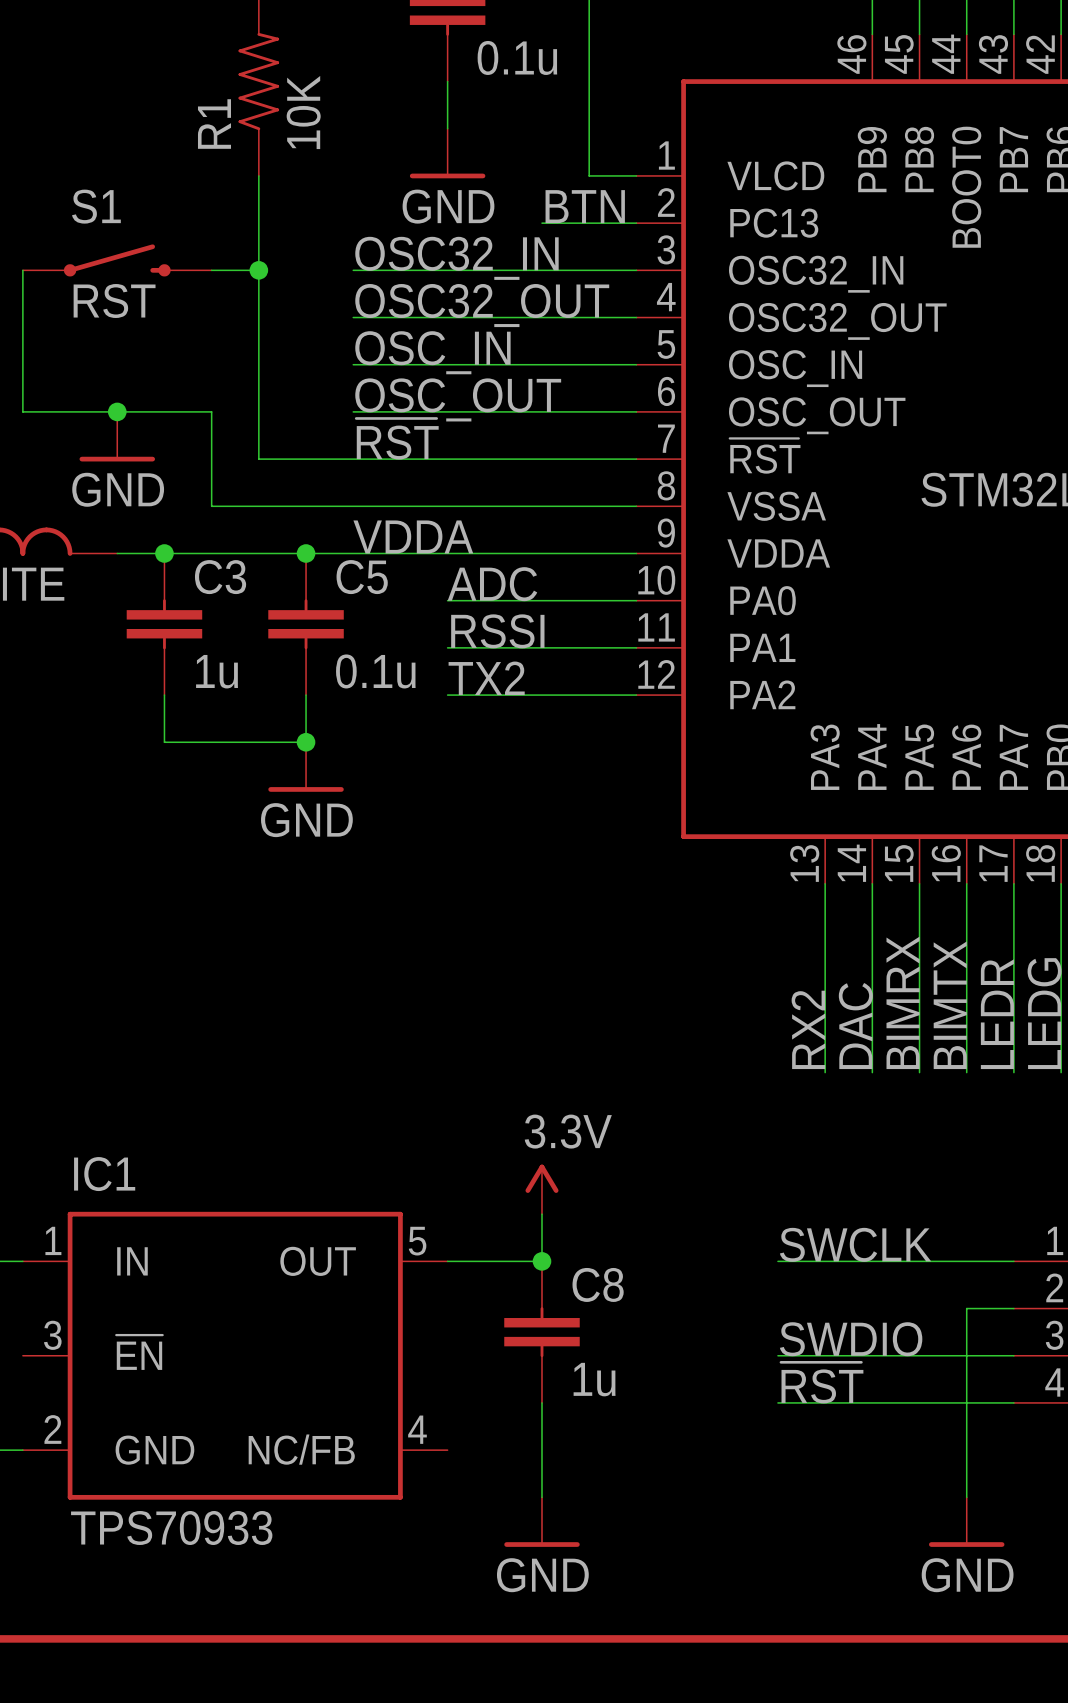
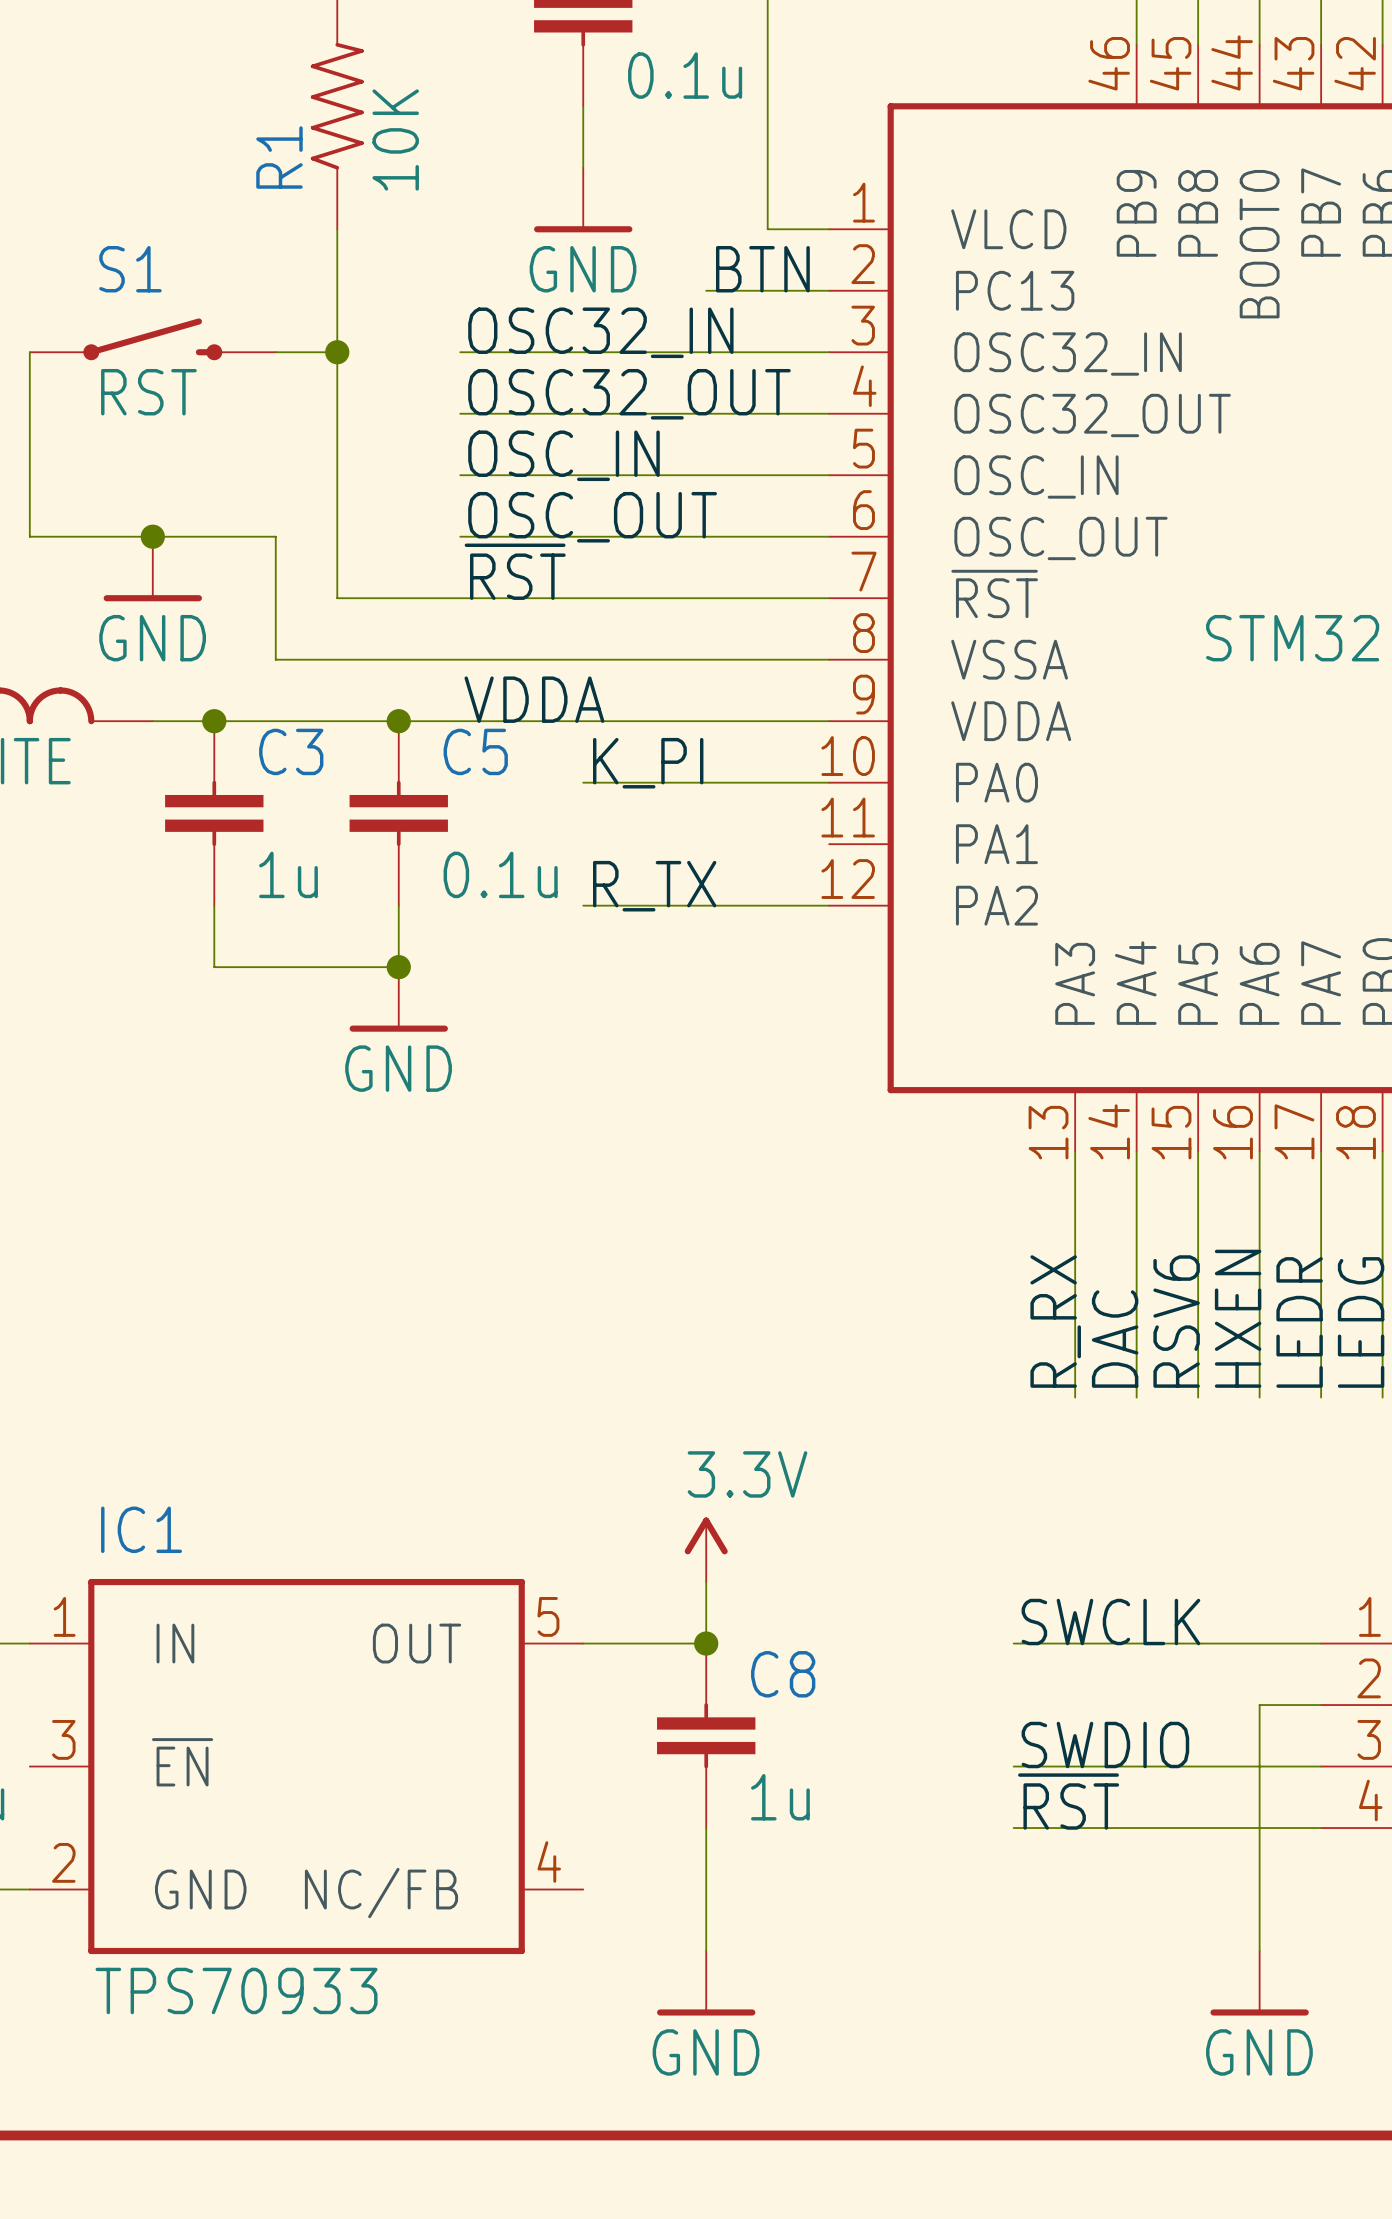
label: ADC (492, 584) -> K_PI (648, 763)
label: RSSI (497, 631) -> none
wire: (447, 647) (636, 647) -> none
label: TX2 (486, 678) -> R_TX (654, 886)
label: BIMRX (903, 1002) -> RSV6 (1176, 1321)
label: BIMTX (950, 1005) -> HXEN (1238, 1318)
label: RX2 (808, 1029) -> R_RX (1055, 1321)

